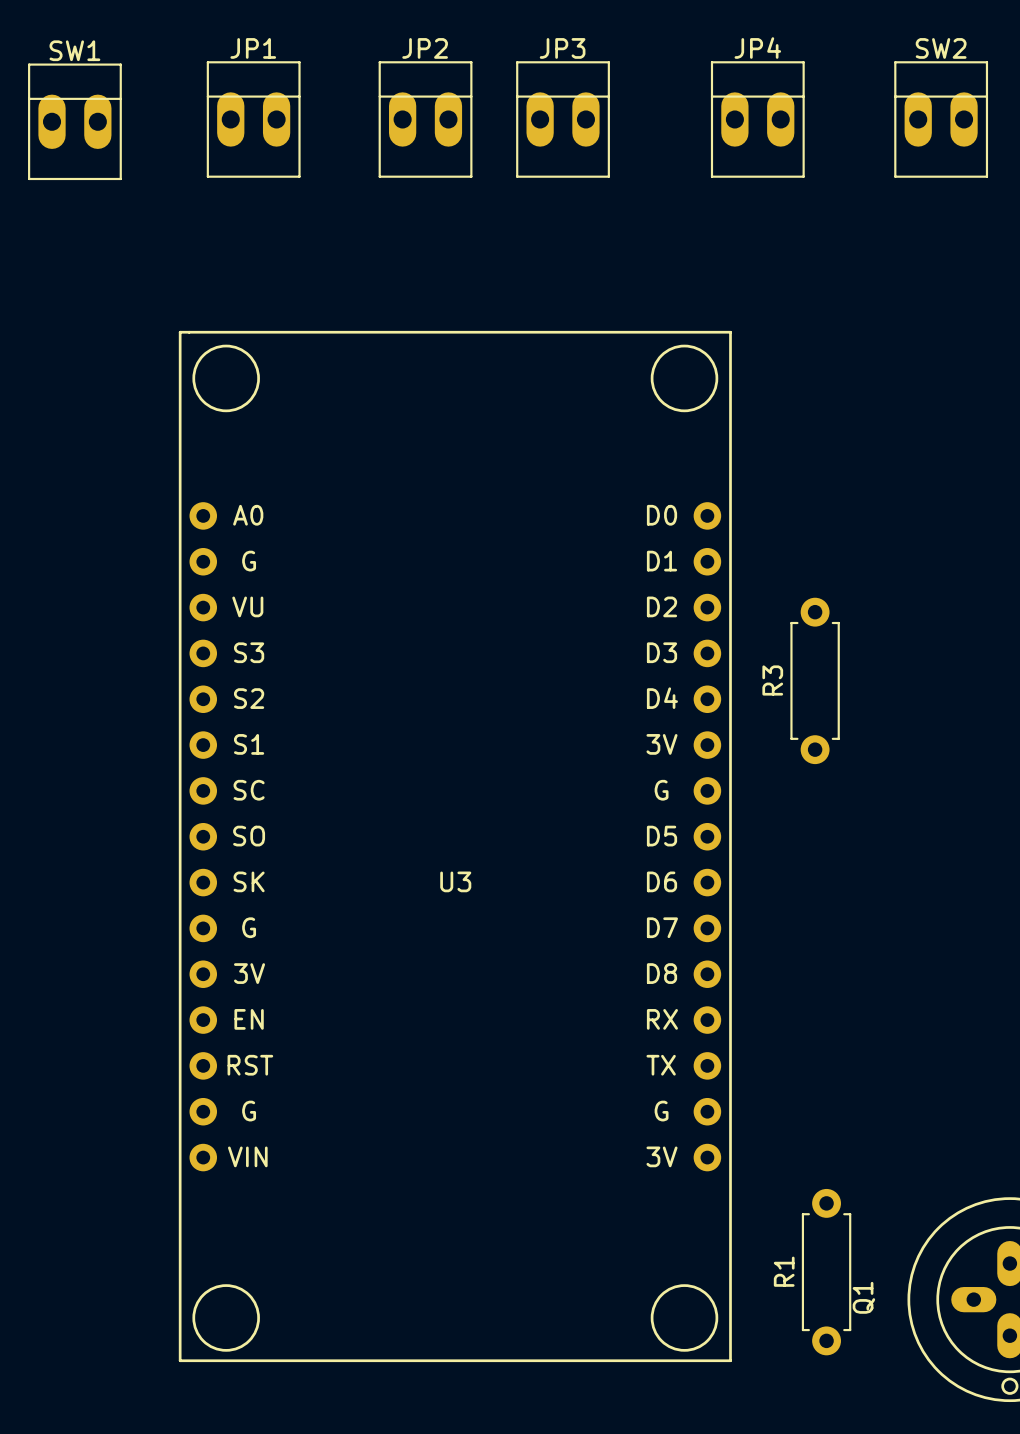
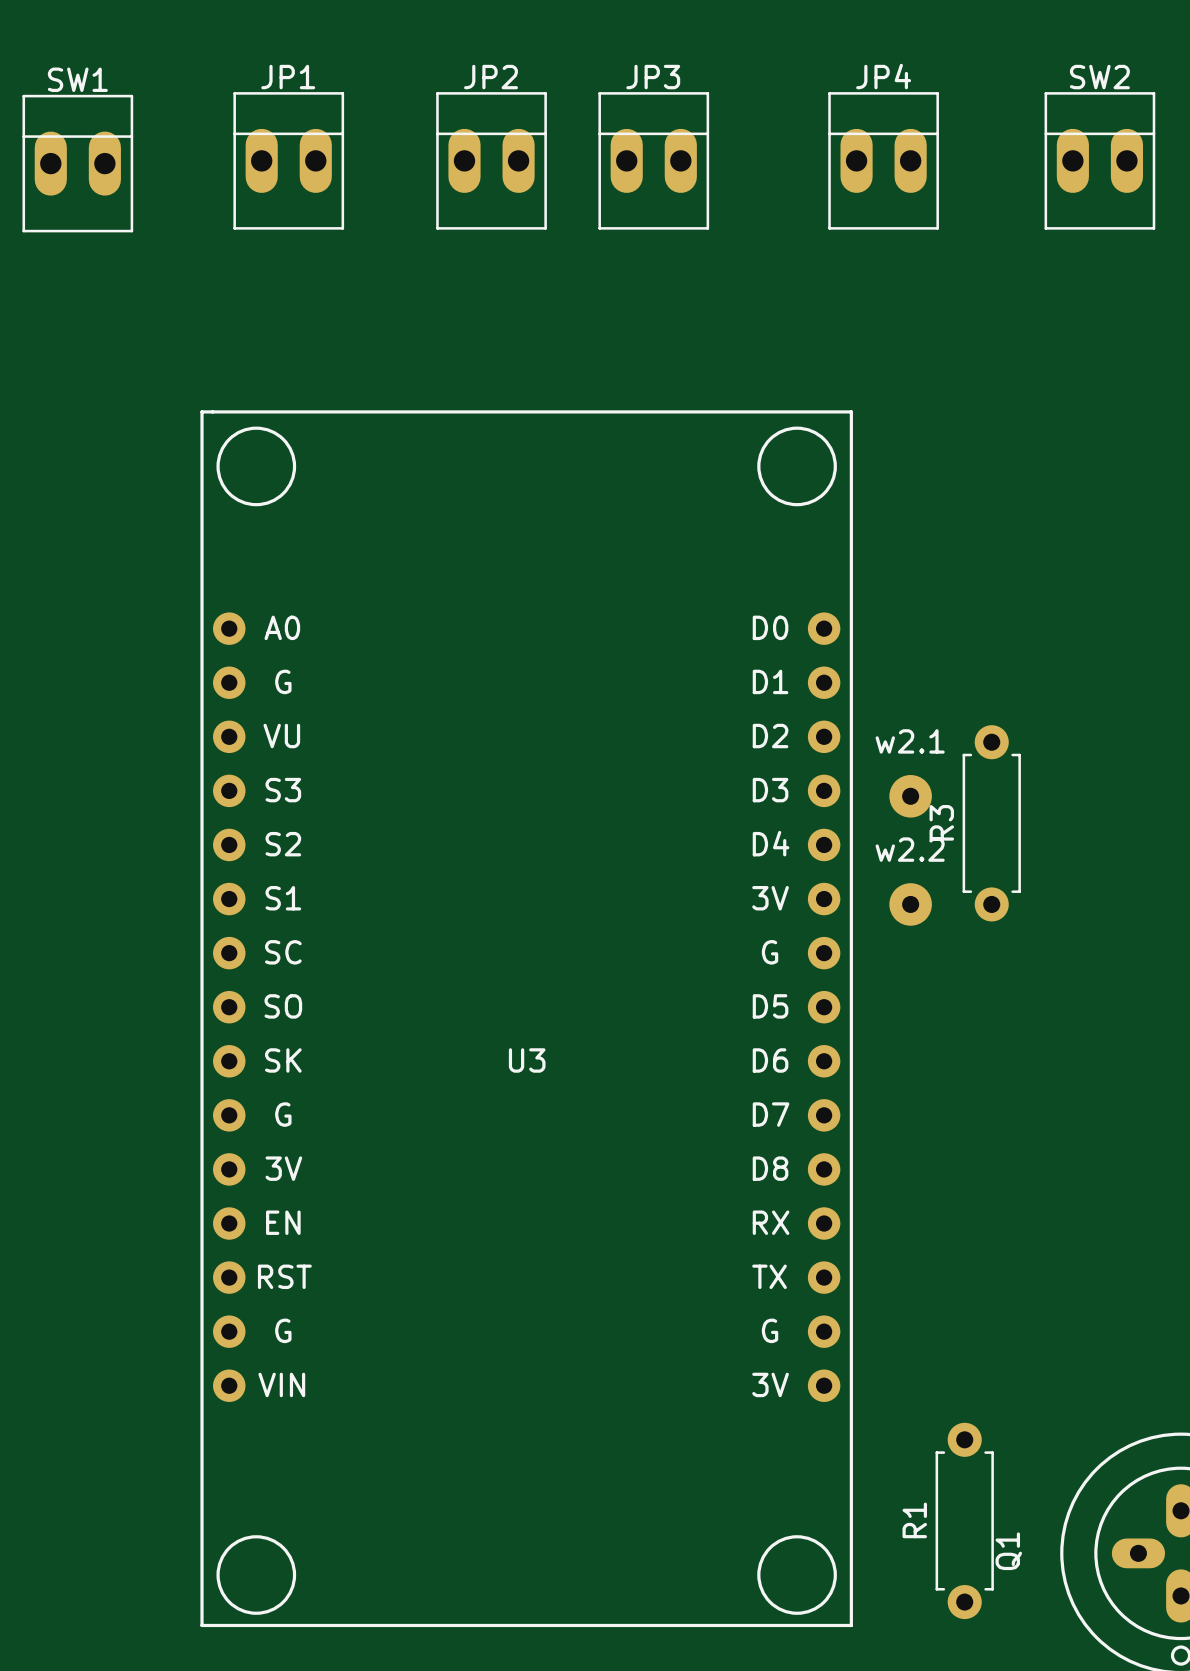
w2.1: none -> (910, 796)
R3 position: (815, 680) -> (991, 823)
w2.2: none -> (910, 904)

